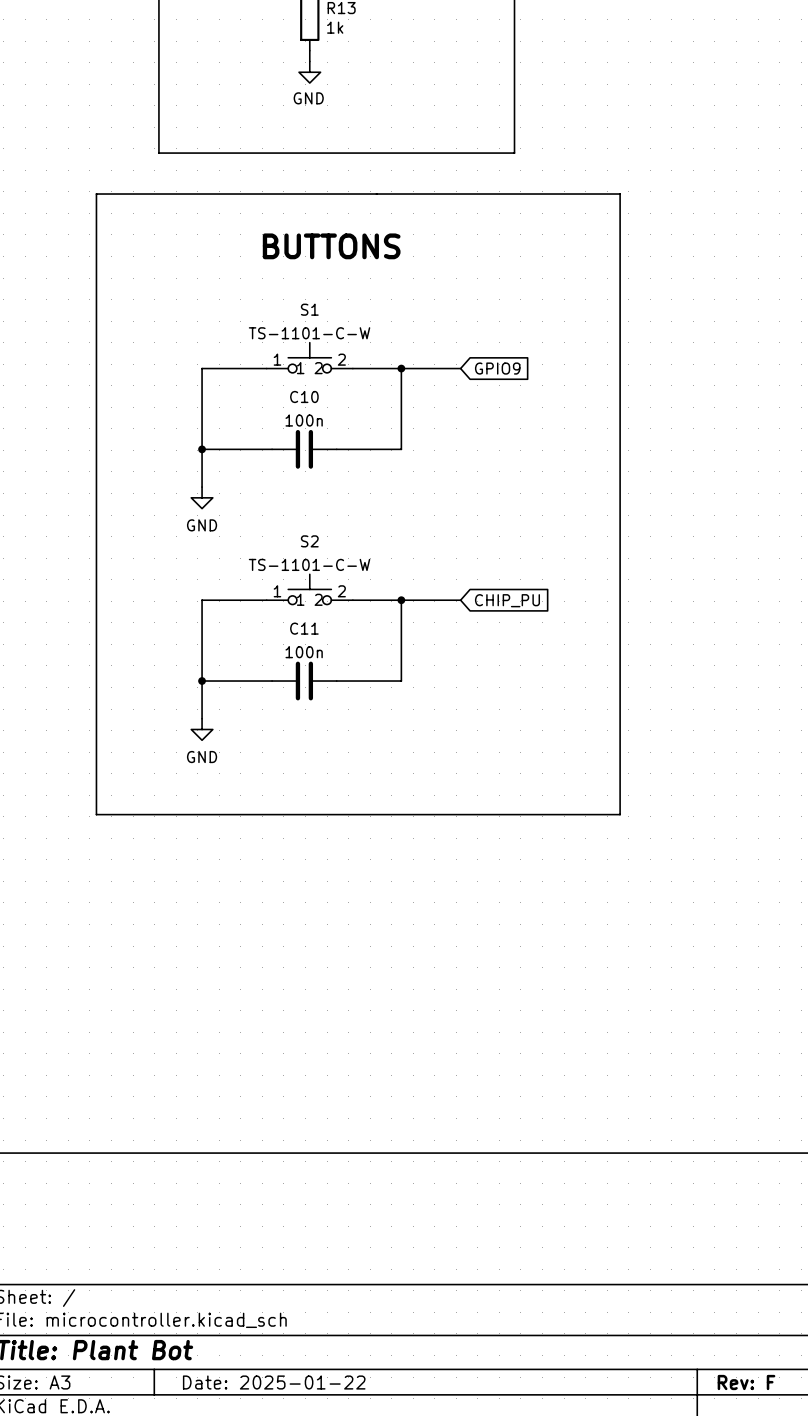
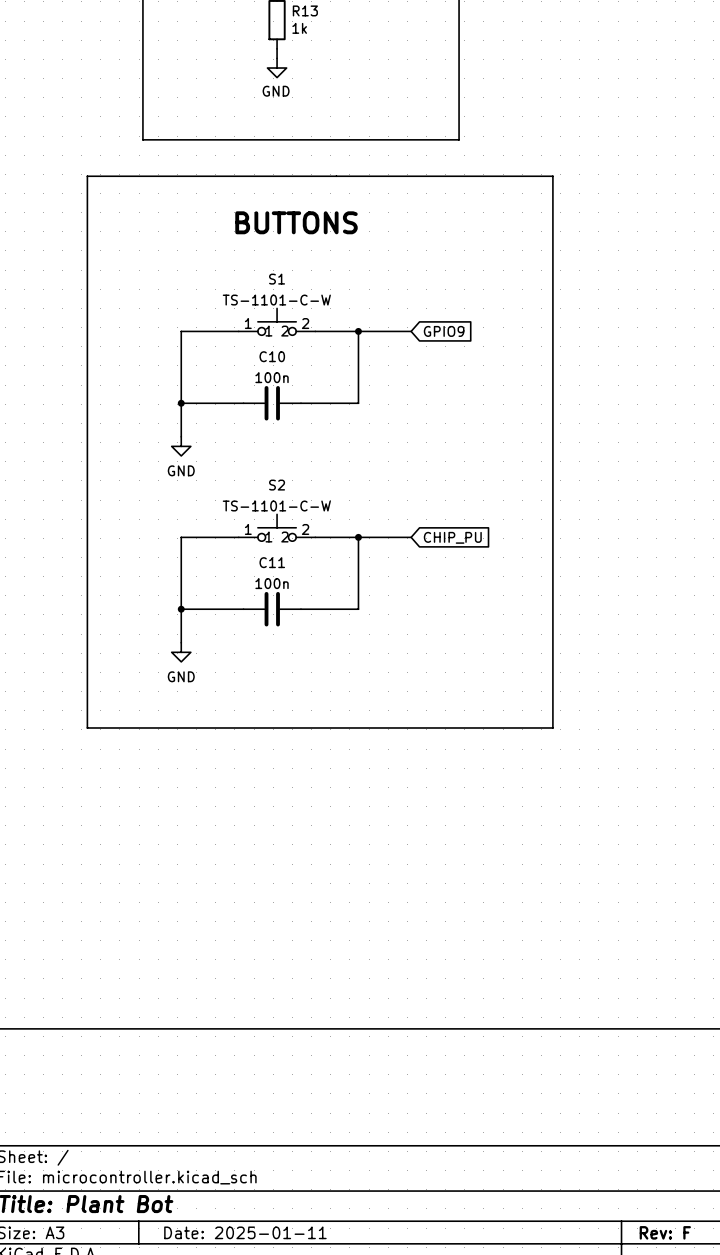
title block: Date: 2025-01-22 (274, 1382) -> Date: 2025-01-11 (245, 1232)

